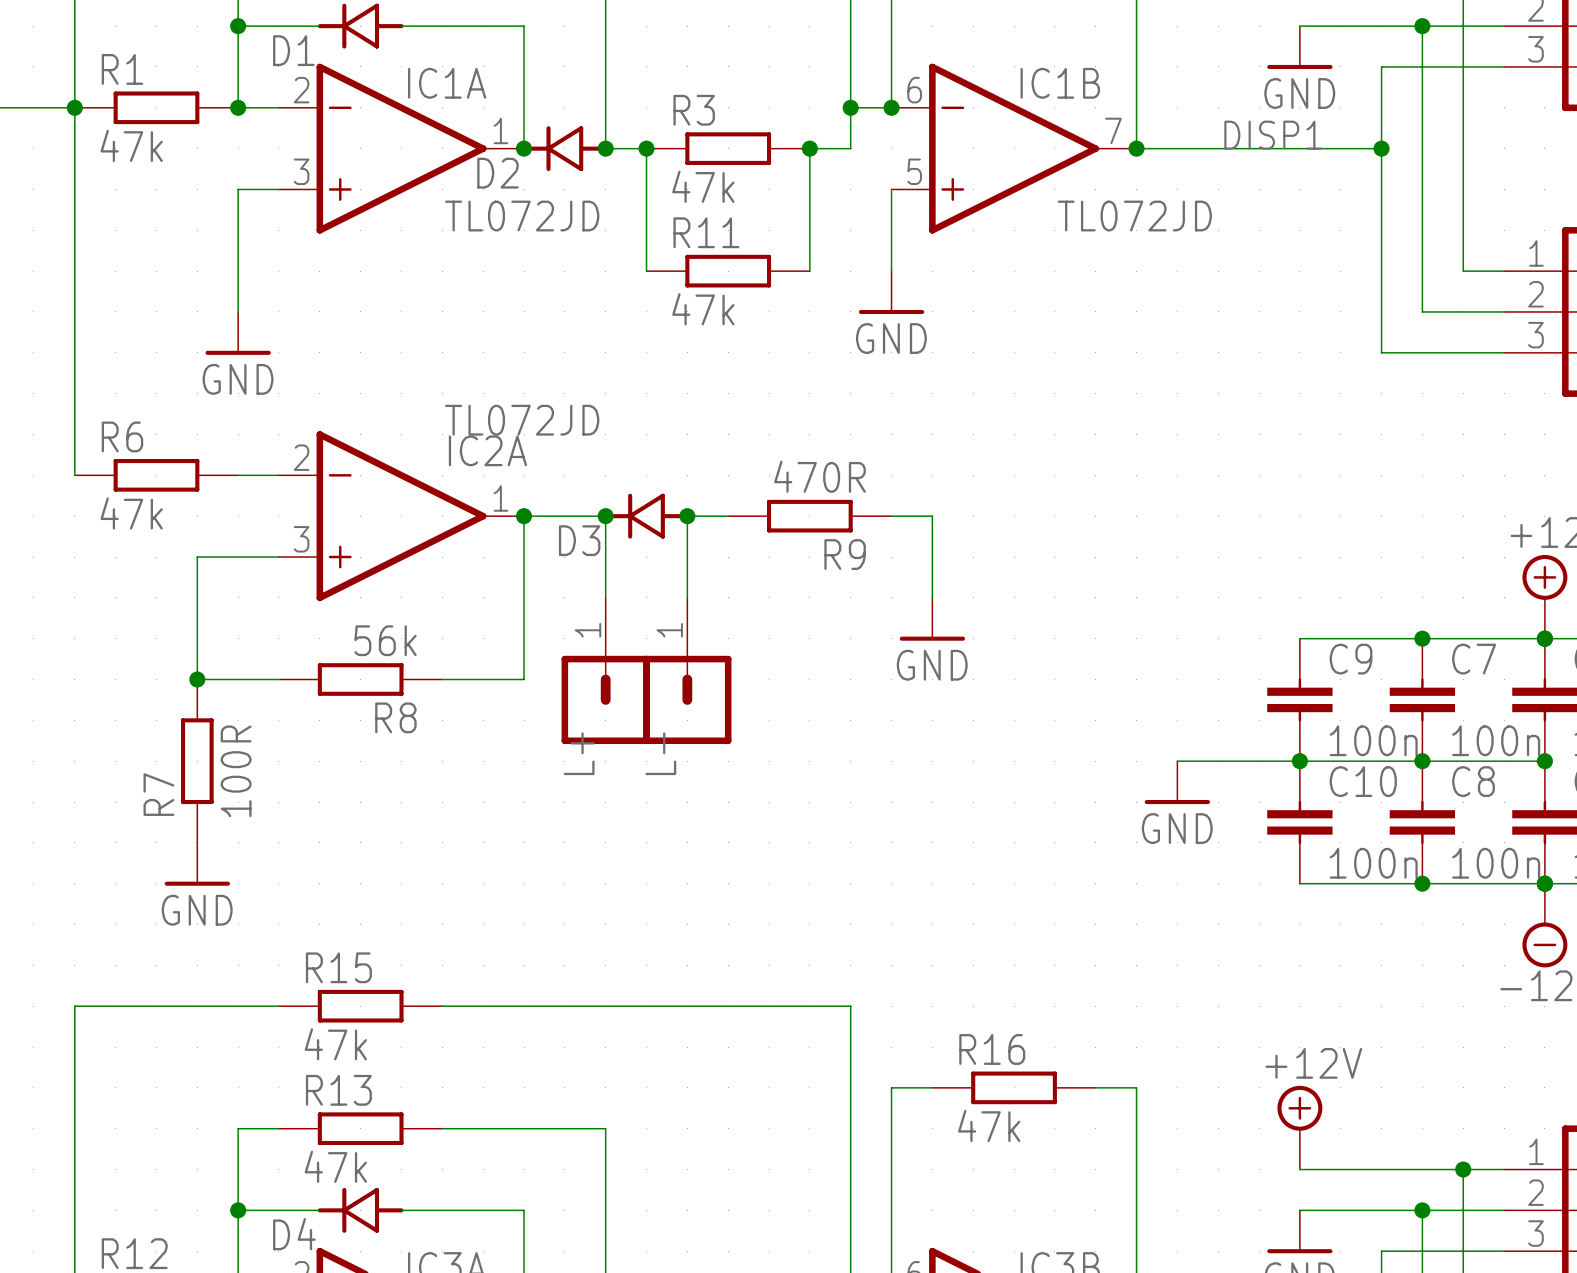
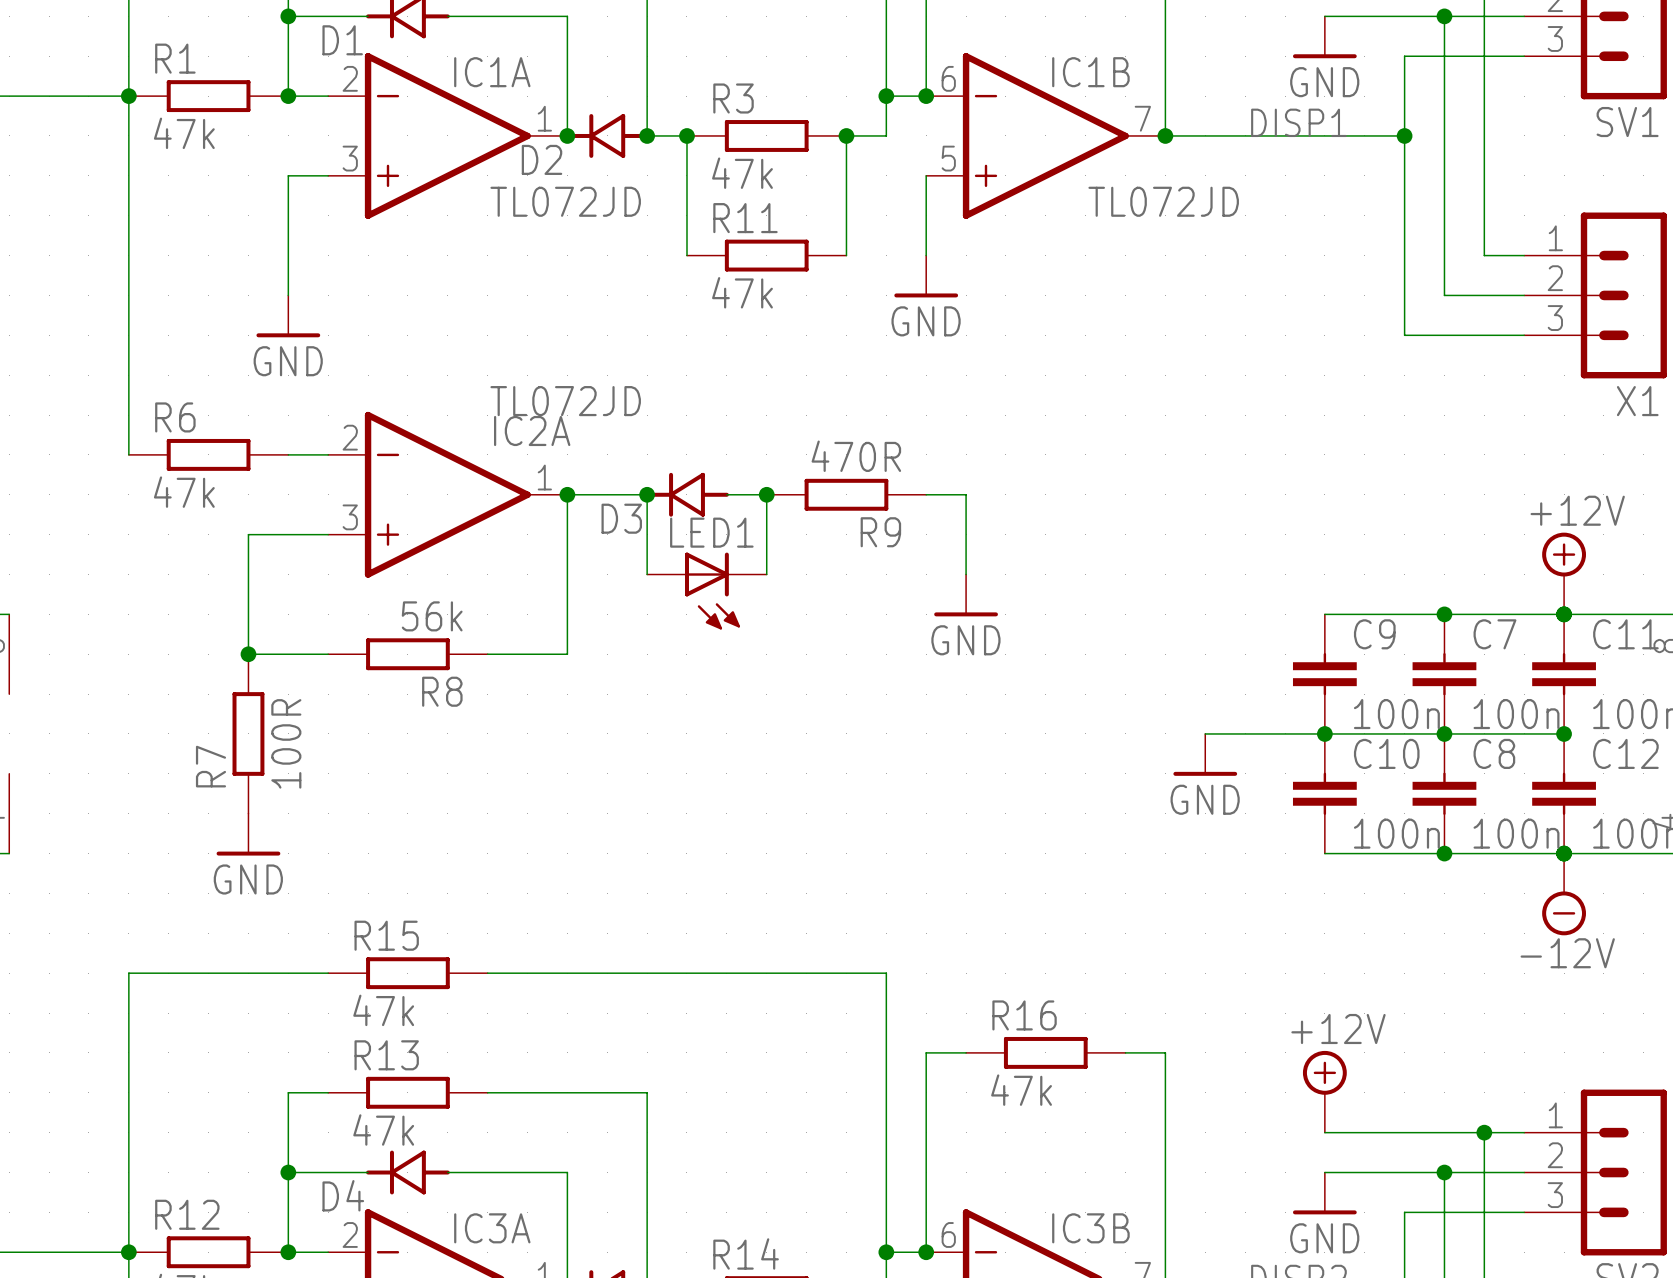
wire: (687, 516) (687, 597) -> (766, 494) (766, 574)
junction position: (687, 516) -> (766, 494)
LED1: none -> (706, 591)
L+: (605, 670) -> none
L-: (687, 670) -> none

